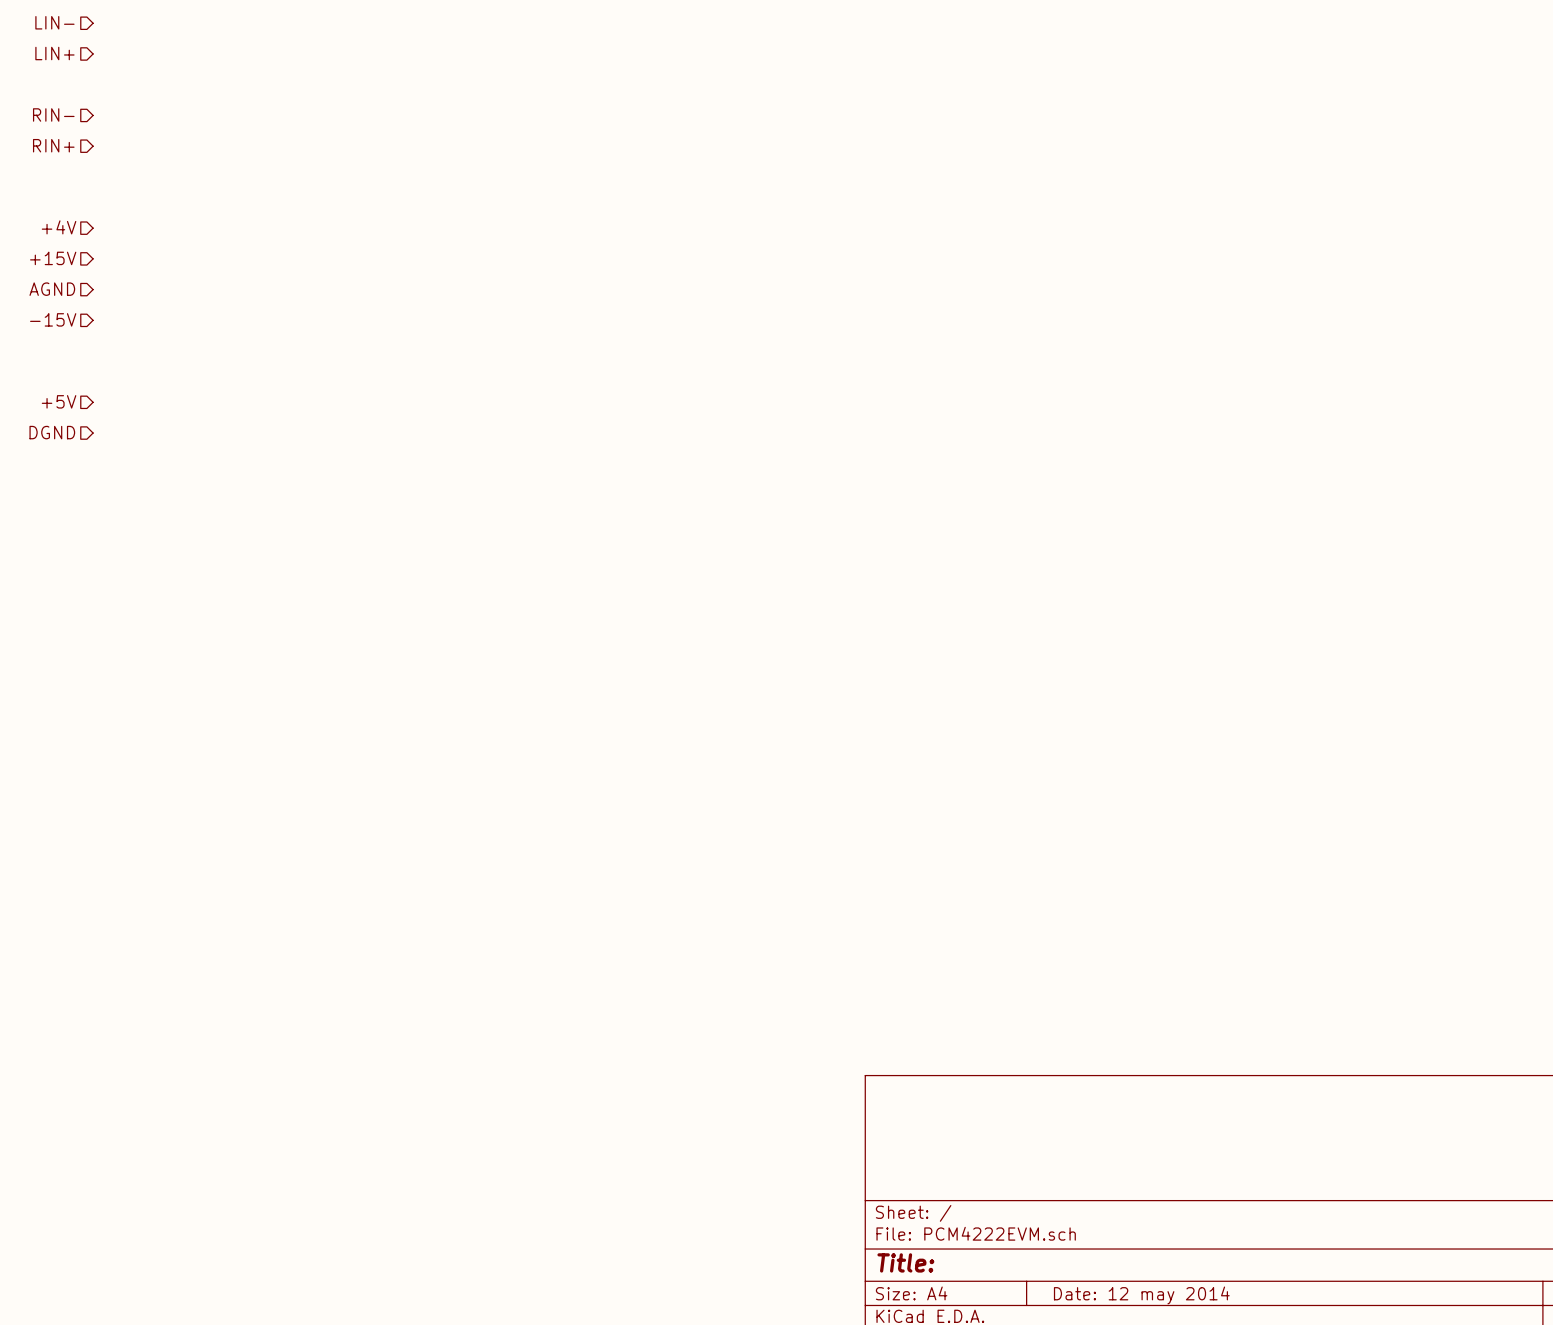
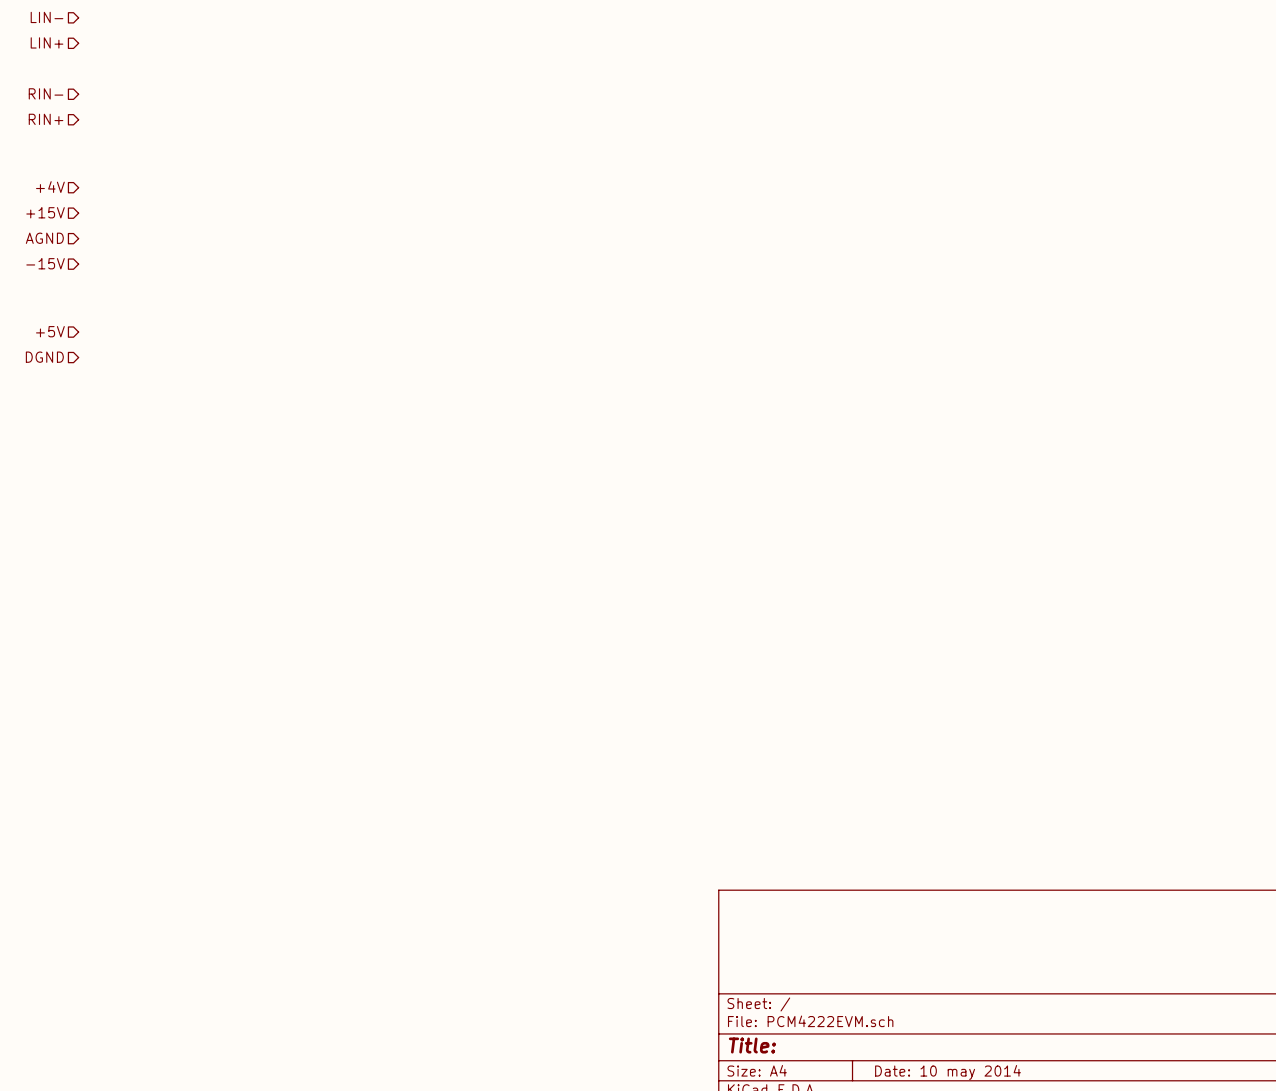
title block: Date: 12 may 2014 (1141, 1295) -> Date: 10 may 2014 (948, 1072)

